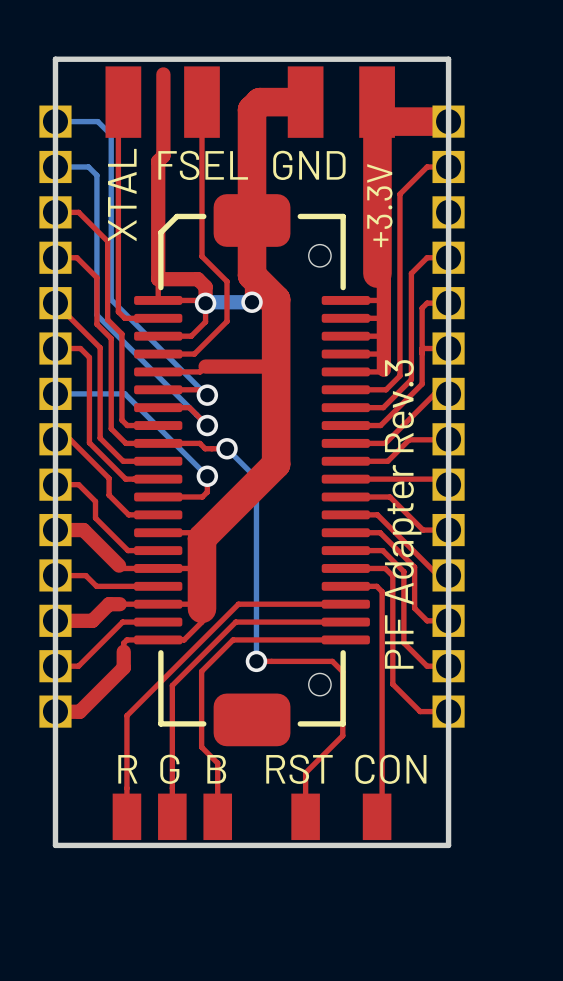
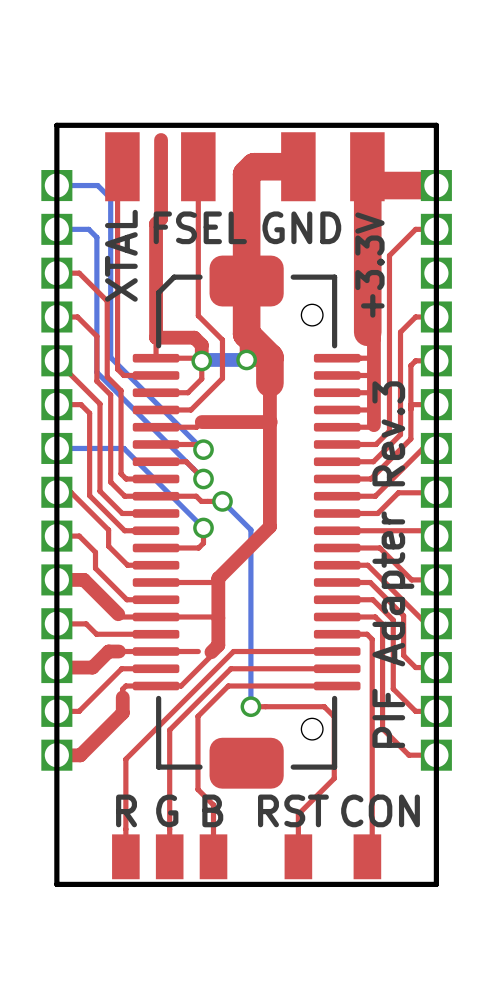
top track width: thick (276, 326) (276, 464) -> thin (269, 383) (269, 516)
top track: (276, 464) (201, 538) (201, 608) -> (269, 516) (269, 526) (218, 578)
top track: none -> (218, 578) (214, 582) (192, 582)
top track: none -> (198, 617) (218, 618)
top track: (201, 616) (201, 622) -> (218, 578) (218, 645) (198, 668)

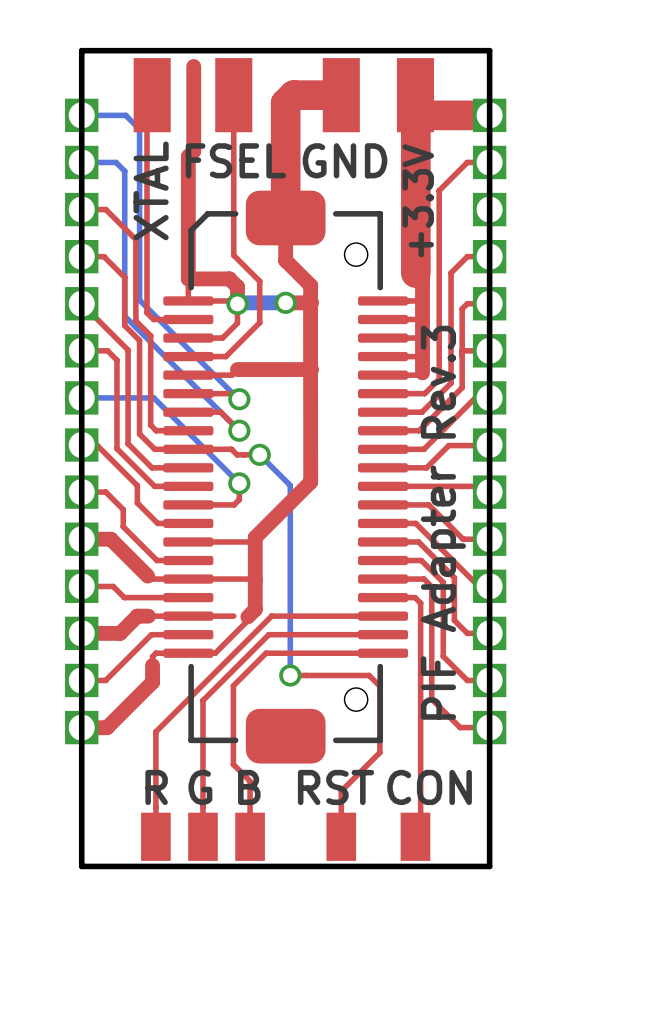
top track: (246, 284) (246, 334) (269, 357) (269, 526) -> (285, 260) (310, 285) (310, 482)

